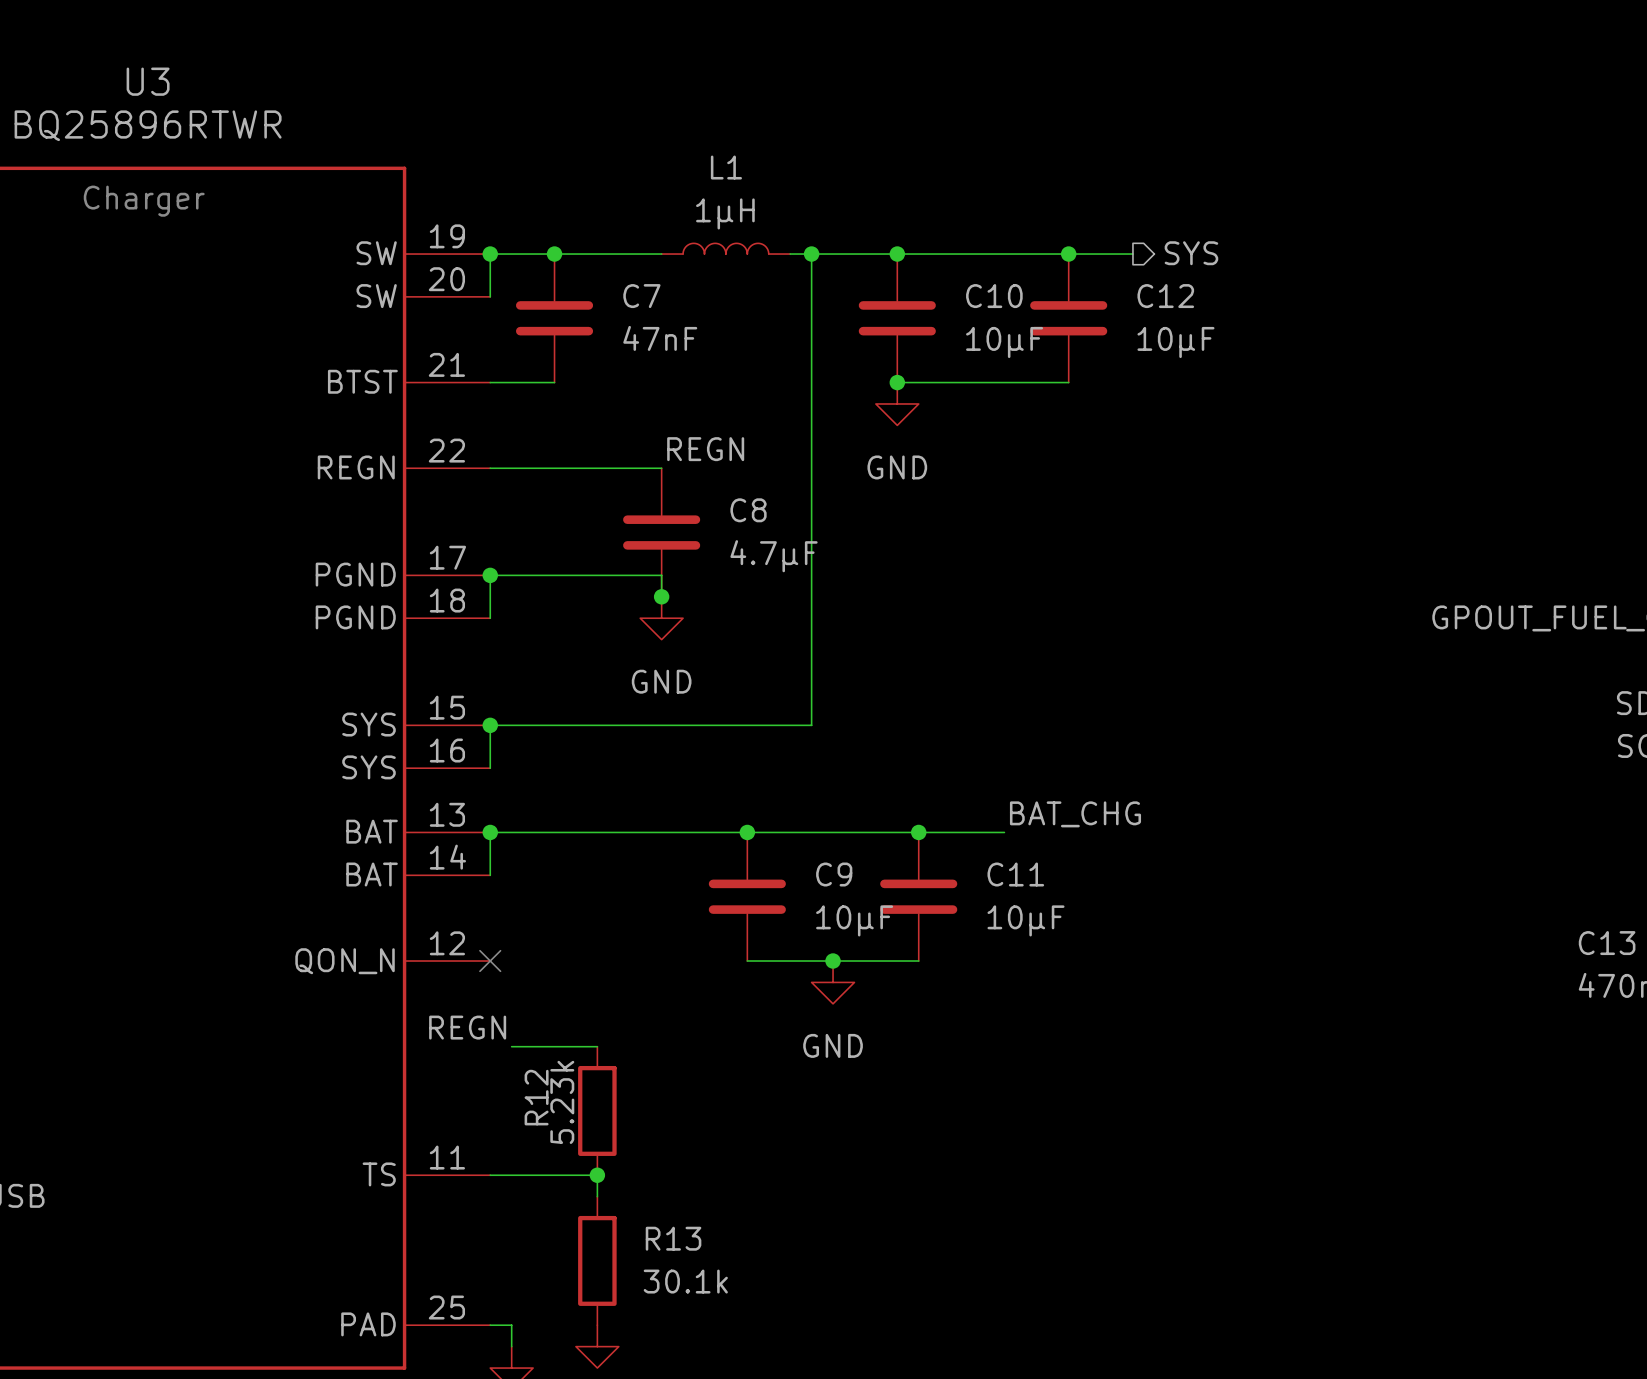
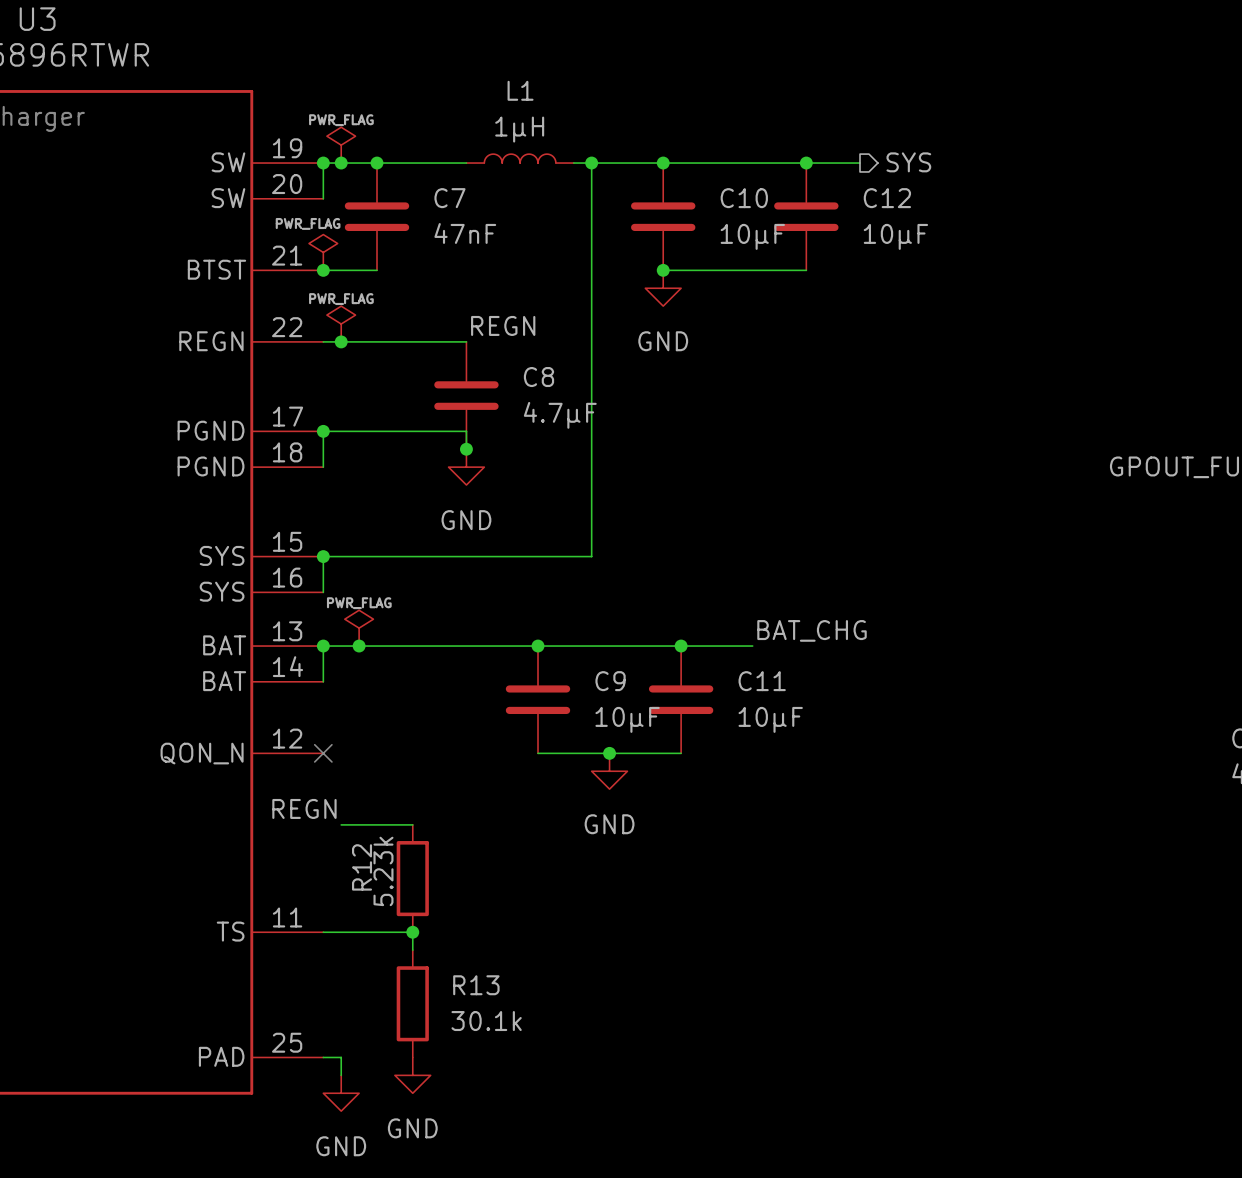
power symbol: none -> PWR_FLAG (341, 145)
junction: none -> (341, 163)
power symbol: none -> PWR_FLAG (323, 252)
junction: none -> (323, 270)
power symbol: none -> PWR_FLAG (341, 324)
junction: none -> (341, 341)
power symbol: none -> PWR_FLAG (359, 628)
junction: none -> (359, 646)

